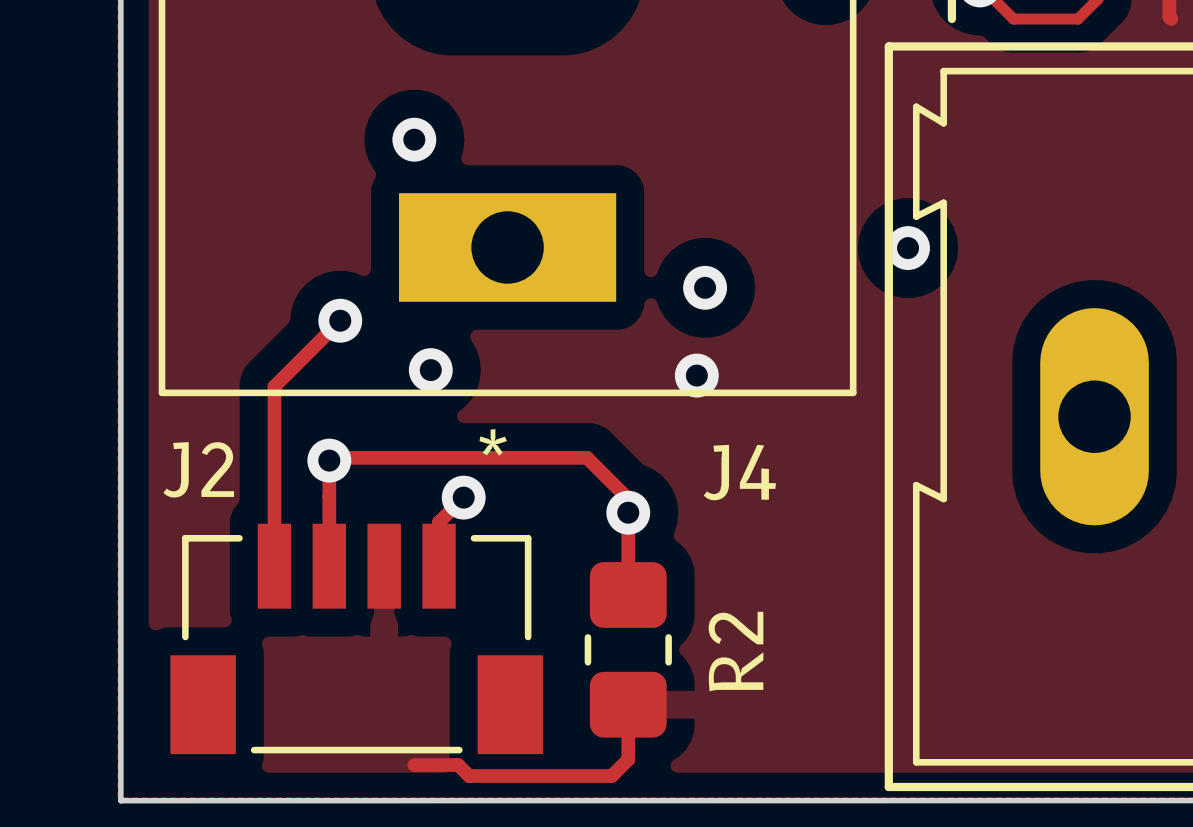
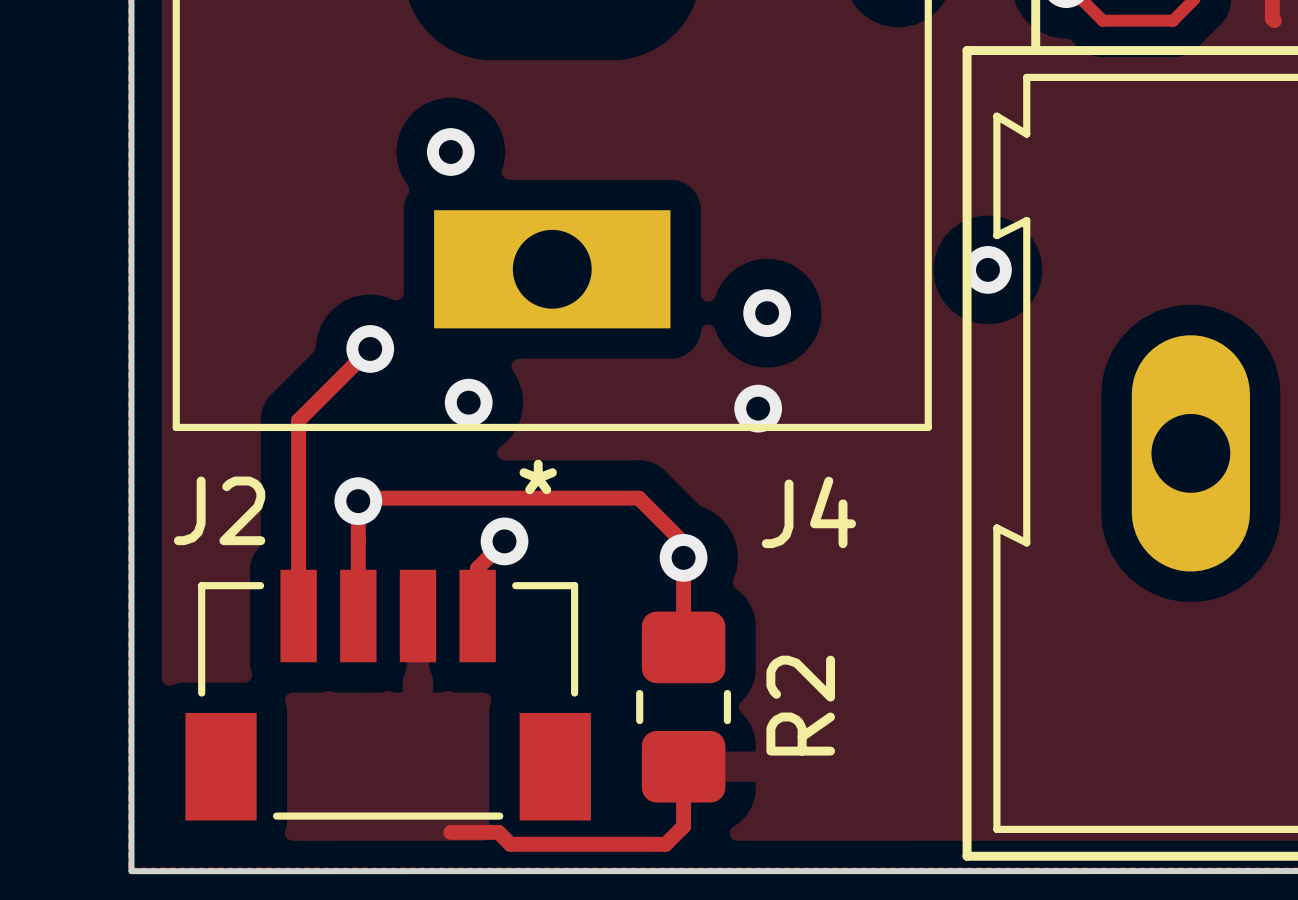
line: none -> (1035, 20) (1035, 50)

